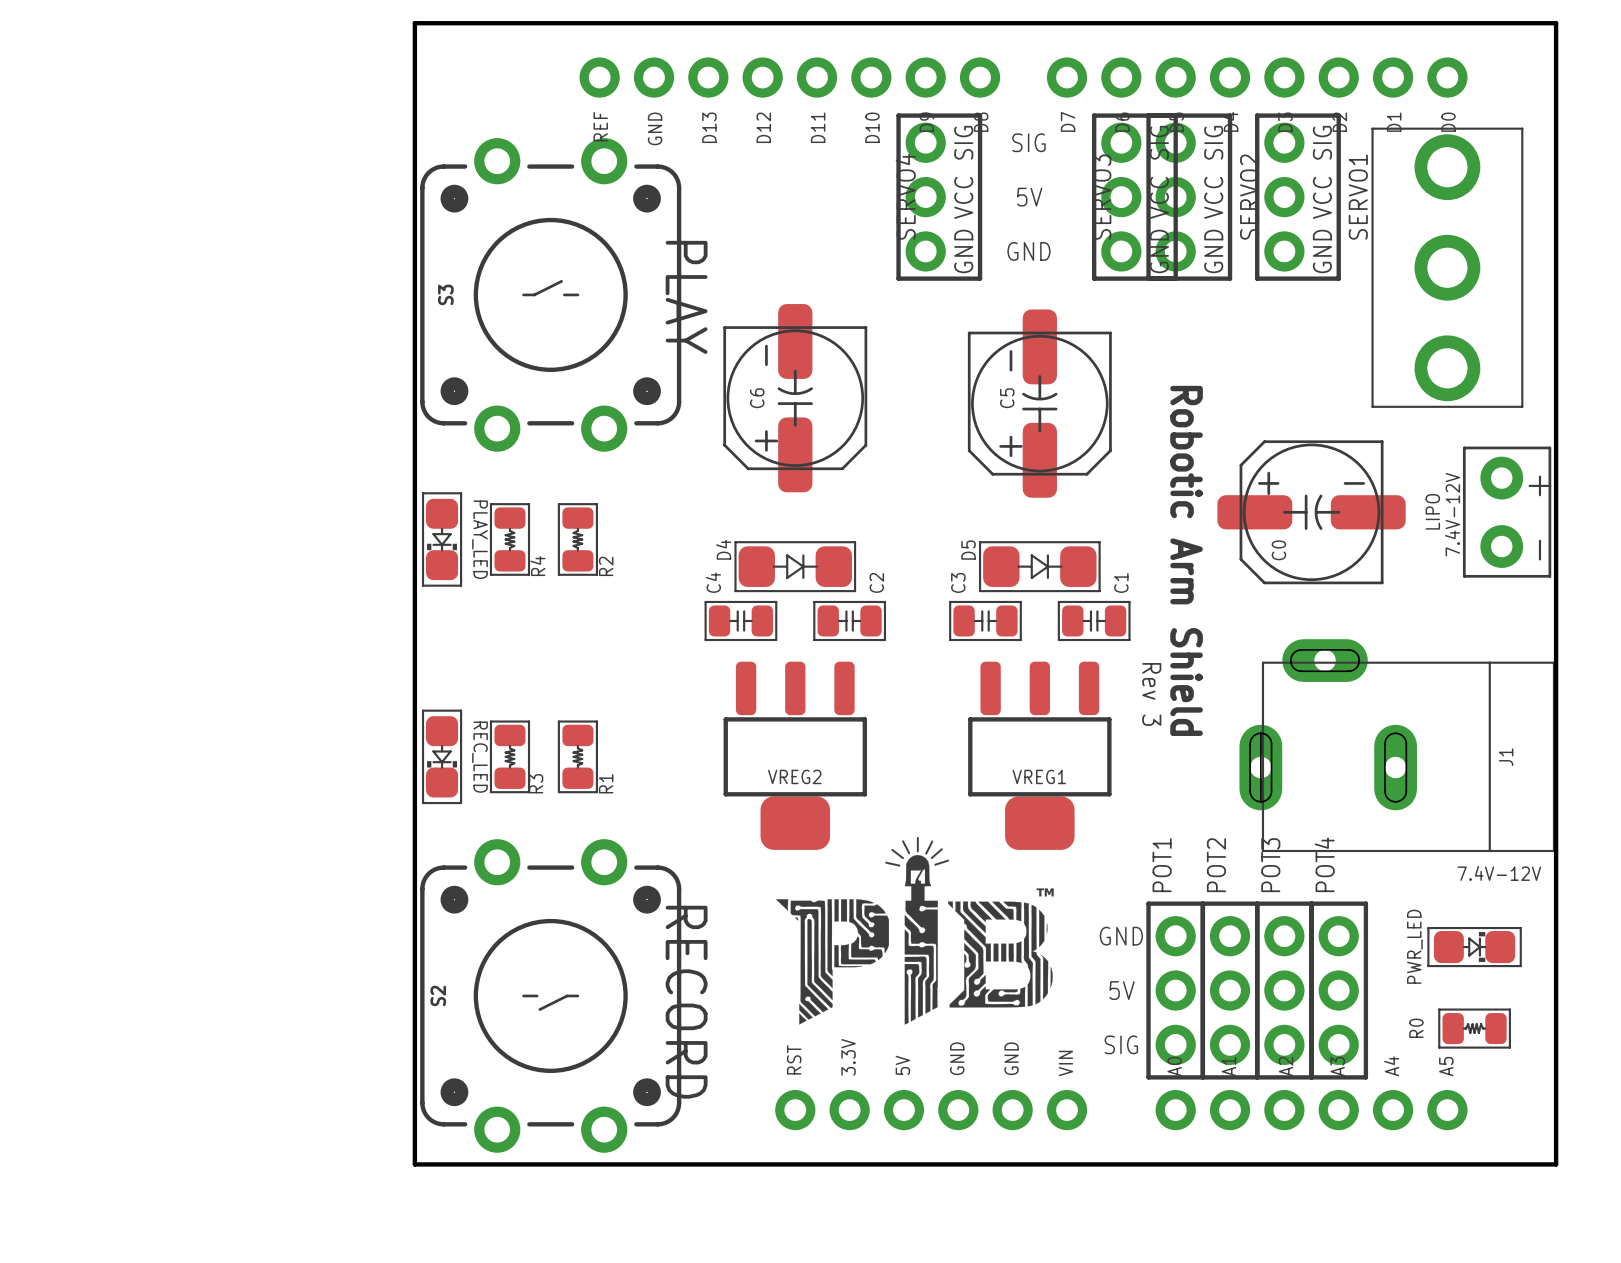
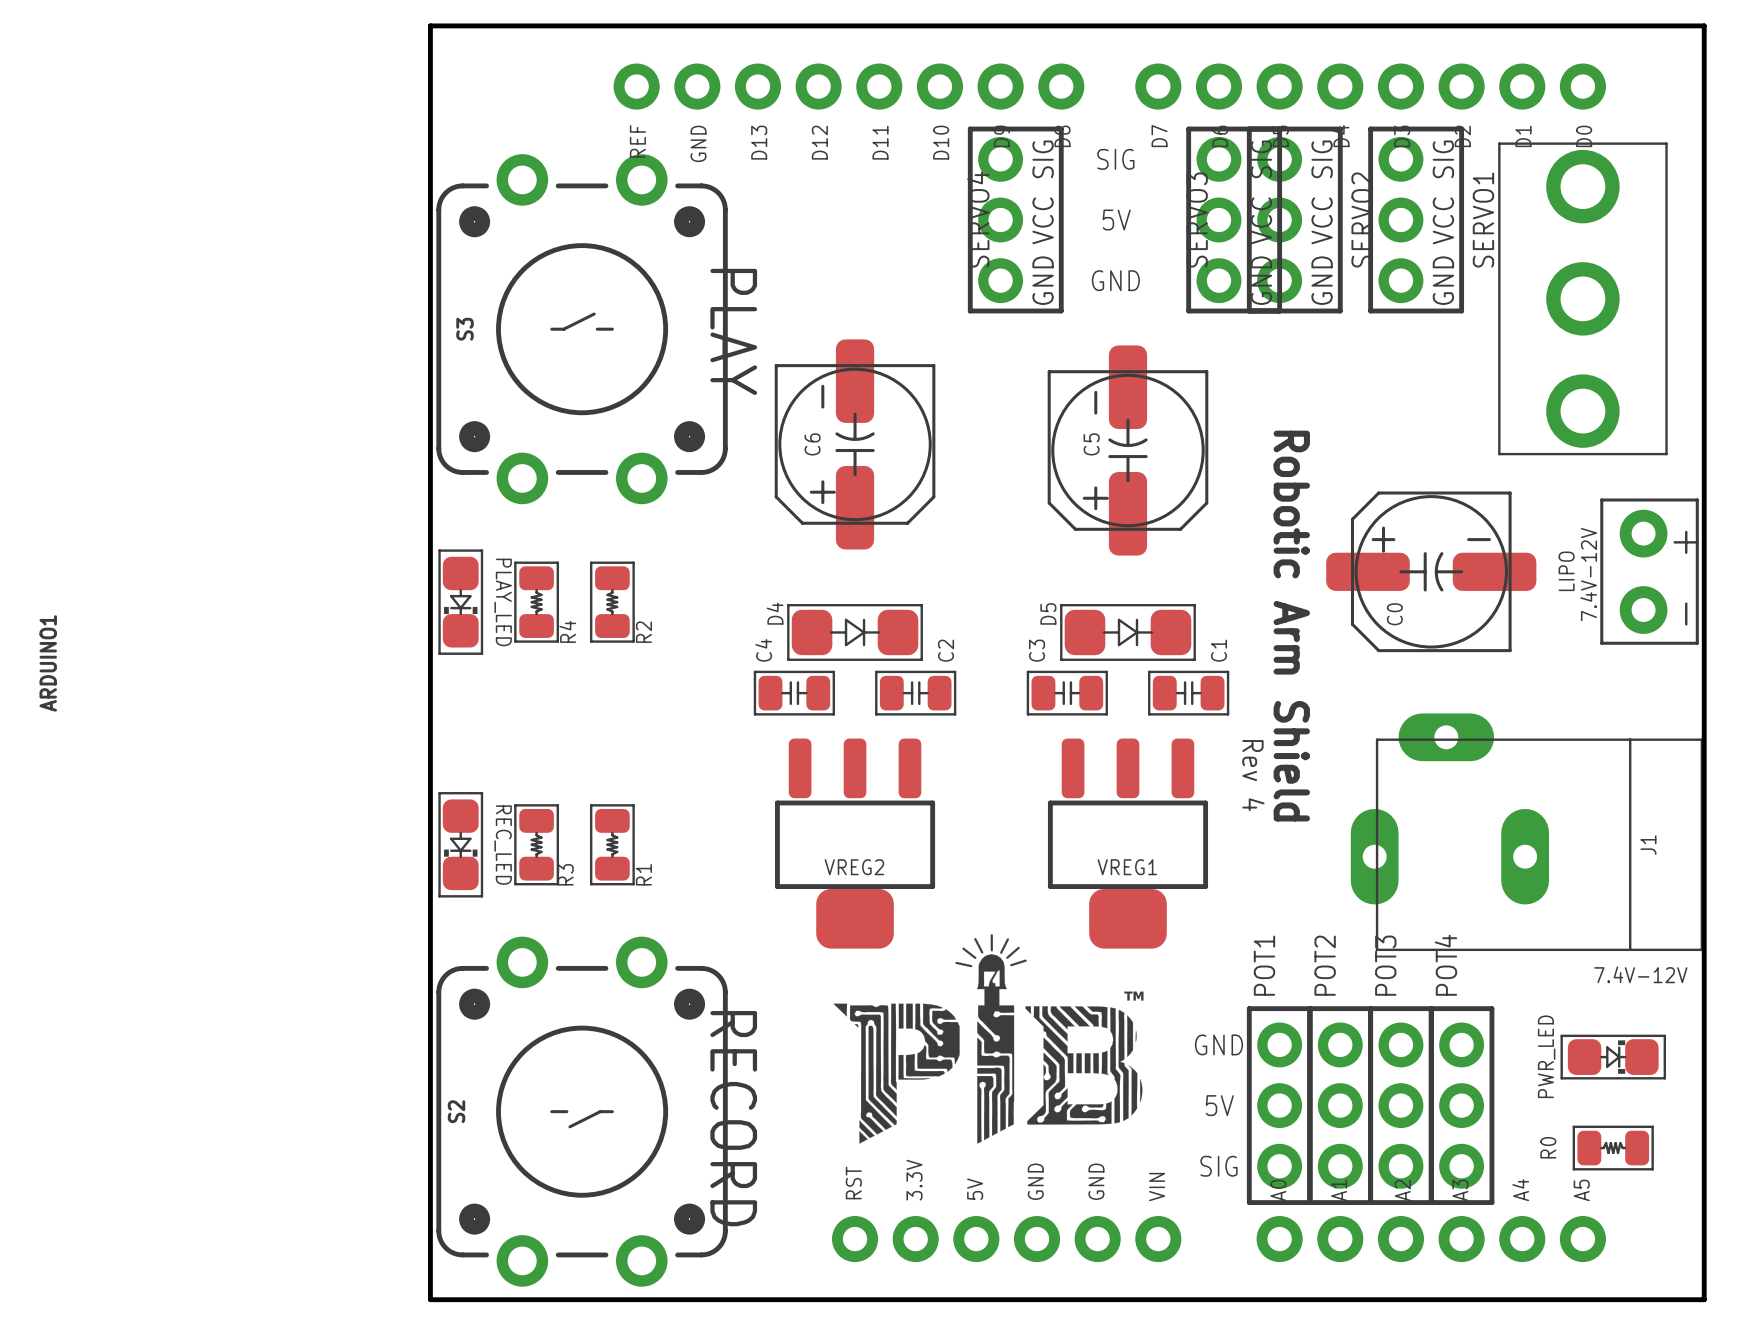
part: (789, 77) -> none
part: (1257, 77) -> none
ARDUINO1: none -> (1109, 662)
J1 footprint: [1239, 639, 1556, 853] -> [1350, 713, 1704, 952]
text: Rev 3 (1151, 694) -> Rev 4 (1253, 775)
part: (931, 1110) -> none
part: (1311, 1110) -> none

